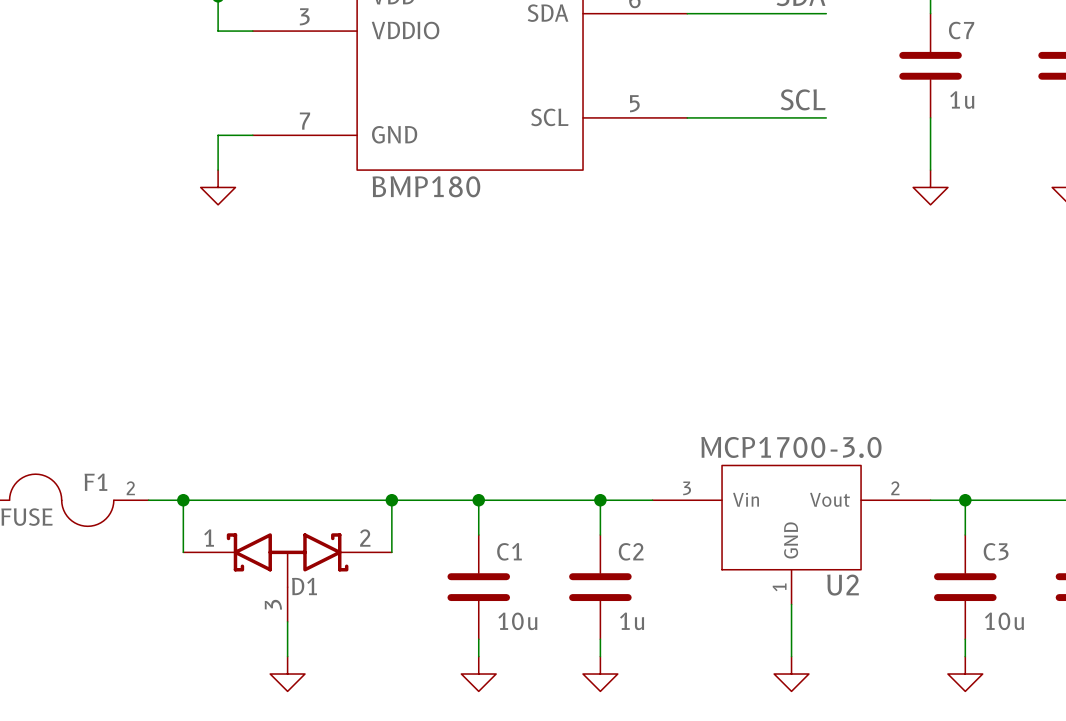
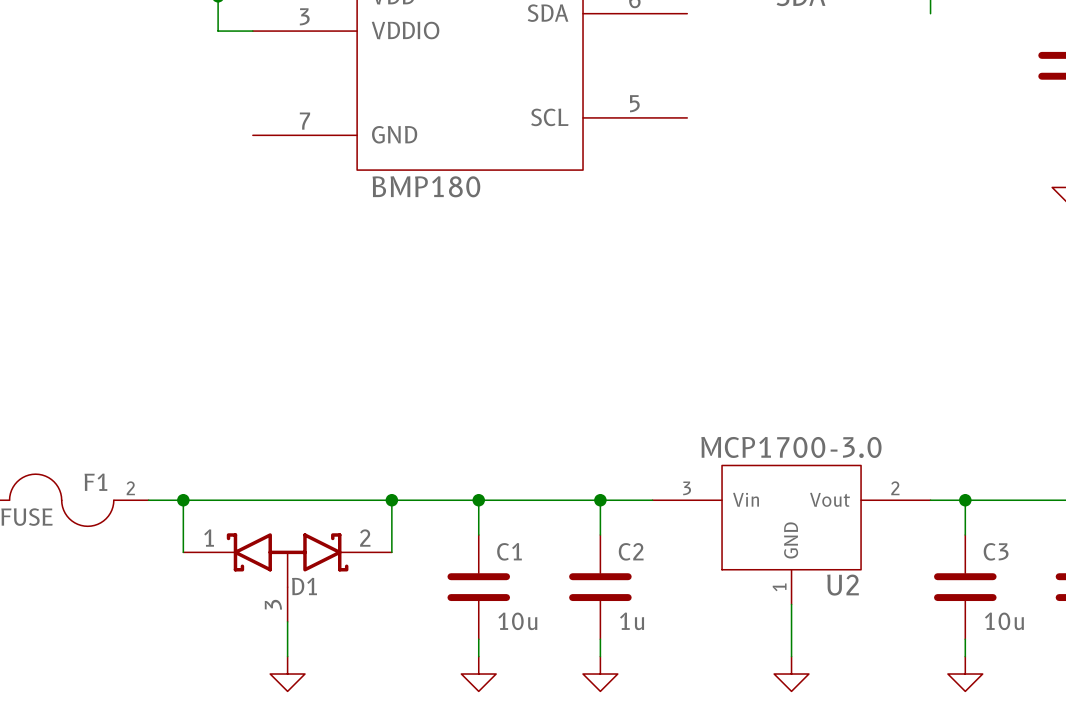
wire: (687, 13) (826, 13) -> none
C7: 1u (930, 65) -> none
label: SCL (803, 99) -> none
wire: (687, 117) (826, 117) -> none
wire: (930, 117) (930, 170) -> none
wire: (252, 135) (218, 135) (218, 170) -> none
power symbol: (218, 187) -> none
power symbol: (930, 187) -> none

